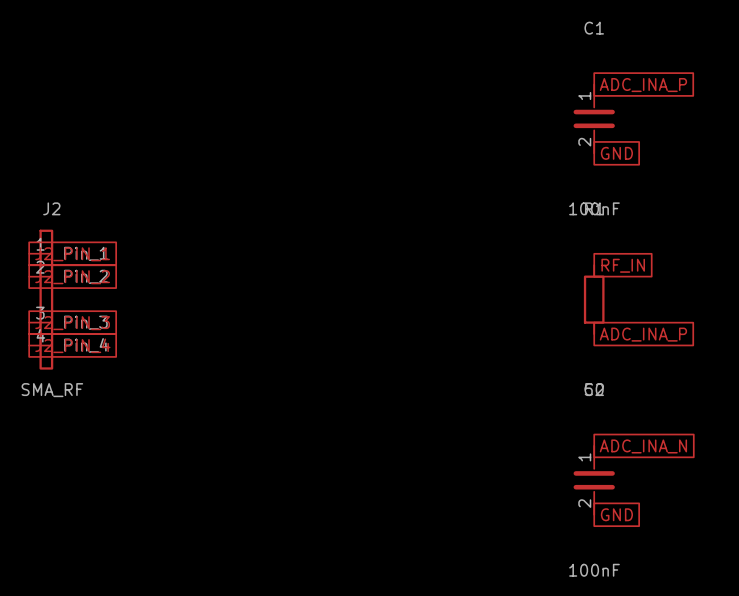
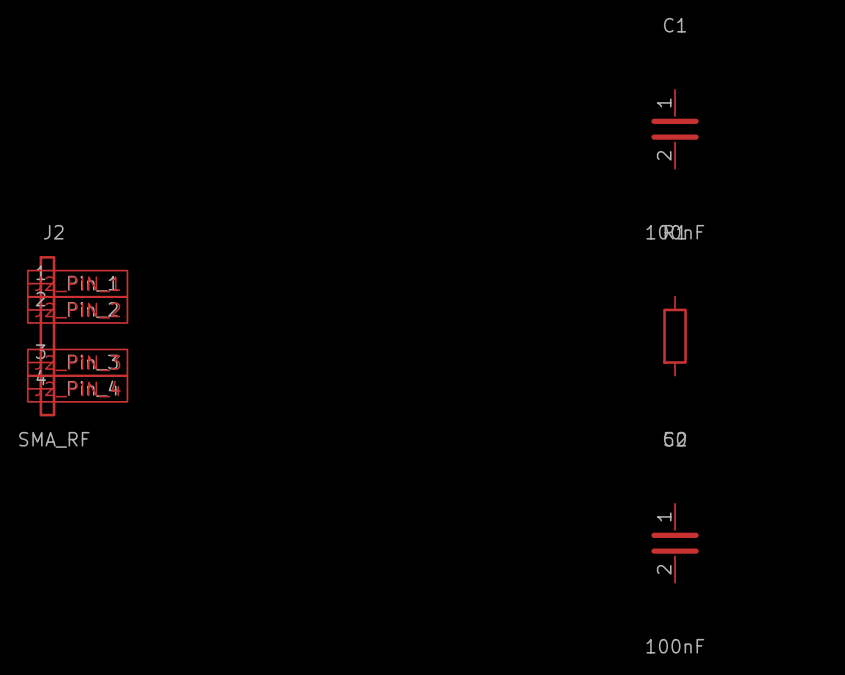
global label: ADC_INA_P (643, 85) -> none
global label: GND (616, 153) -> none
global label: RF_IN (623, 265) -> none
global label: ADC_INA_P (643, 334) -> none
global label: ADC_INA_N (643, 446) -> none
global label: GND (616, 514) -> none

